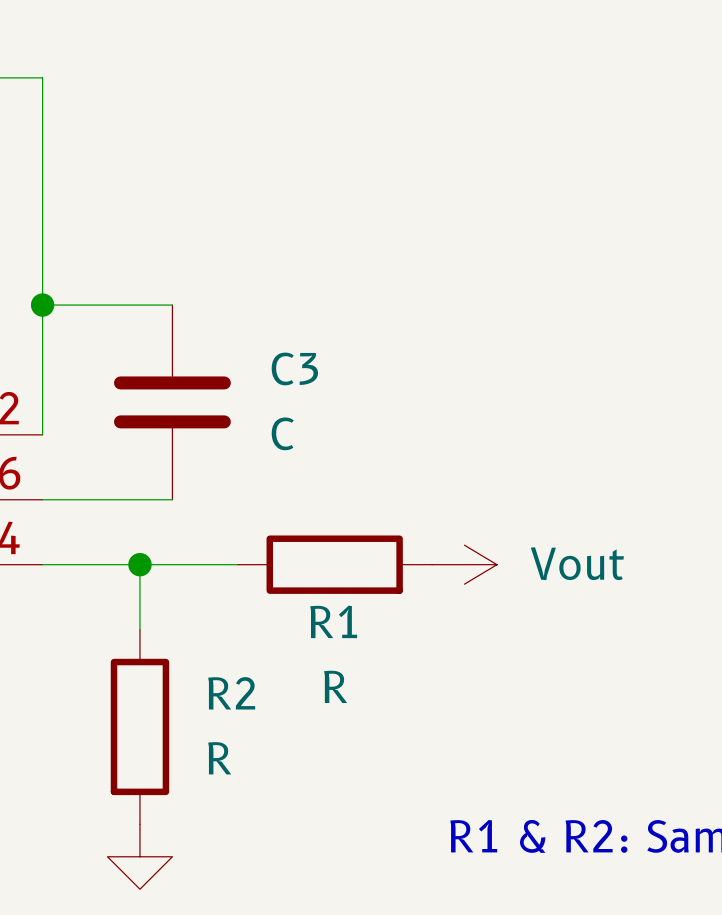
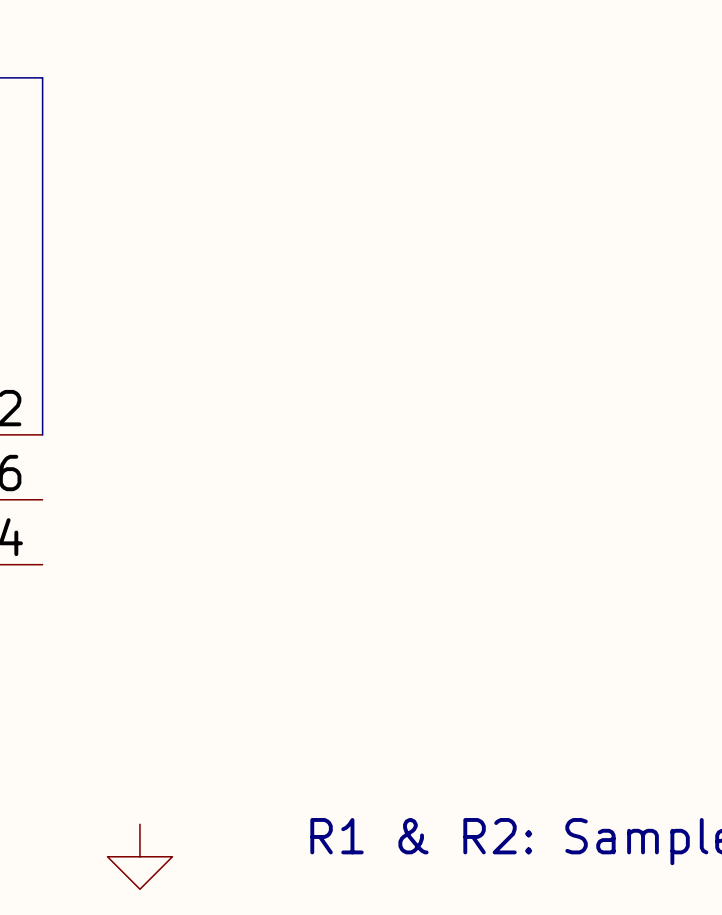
wire: (42, 305) (172, 305) -> none
junction: (42, 305) -> none
C3: C (172, 402) -> none
wire: (42, 499) (172, 499) -> none
wire: (42, 564) (237, 564) -> none
wire: (139, 564) (139, 629) -> none
junction: (139, 564) -> none
R1: R (334, 564) -> none
power symbol: Vout (464, 564) -> none
R2: R (139, 726) -> none

